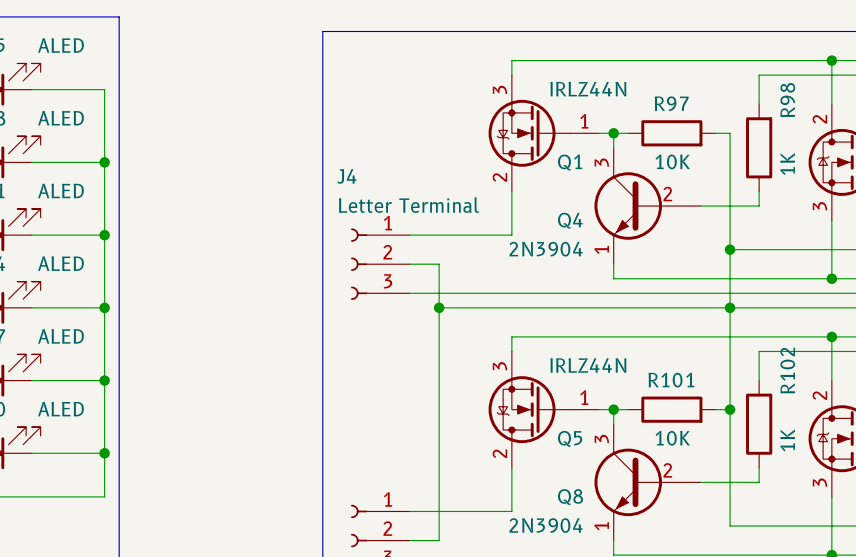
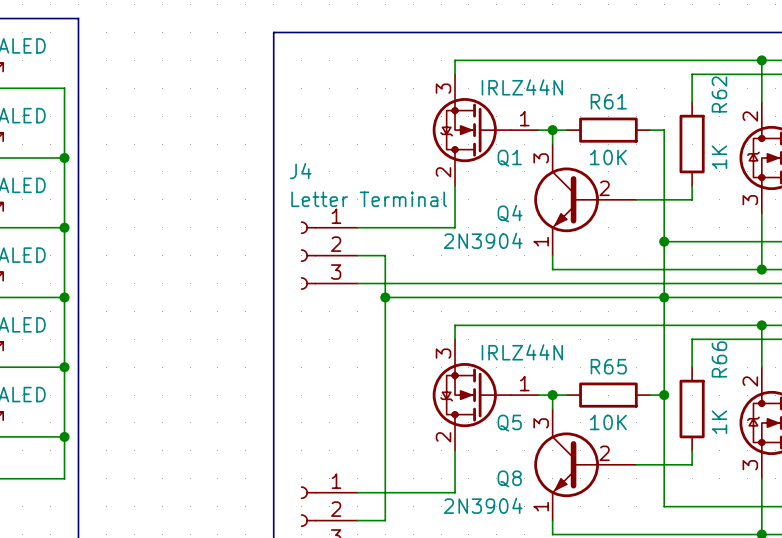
R98 name: R98 (787, 100) -> R62 (719, 94)
R97 name: R97 (671, 103) -> R61 (608, 101)
R102 name: R102 (787, 370) -> R66 (719, 359)
R101 name: R101 (671, 380) -> R65 (608, 366)

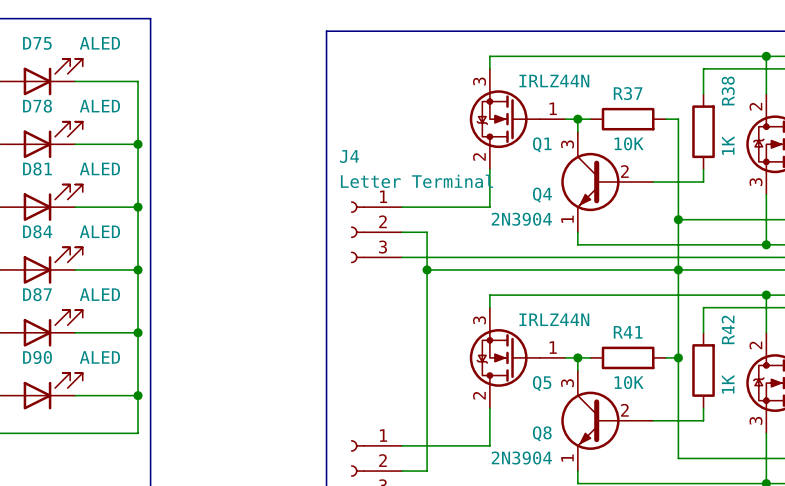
R62 name: R62 (719, 94) -> R38 (728, 90)
R61 name: R61 (608, 101) -> R37 (628, 93)
R66 name: R66 (719, 359) -> R42 (728, 329)
R65 name: R65 (608, 366) -> R41 (628, 332)

